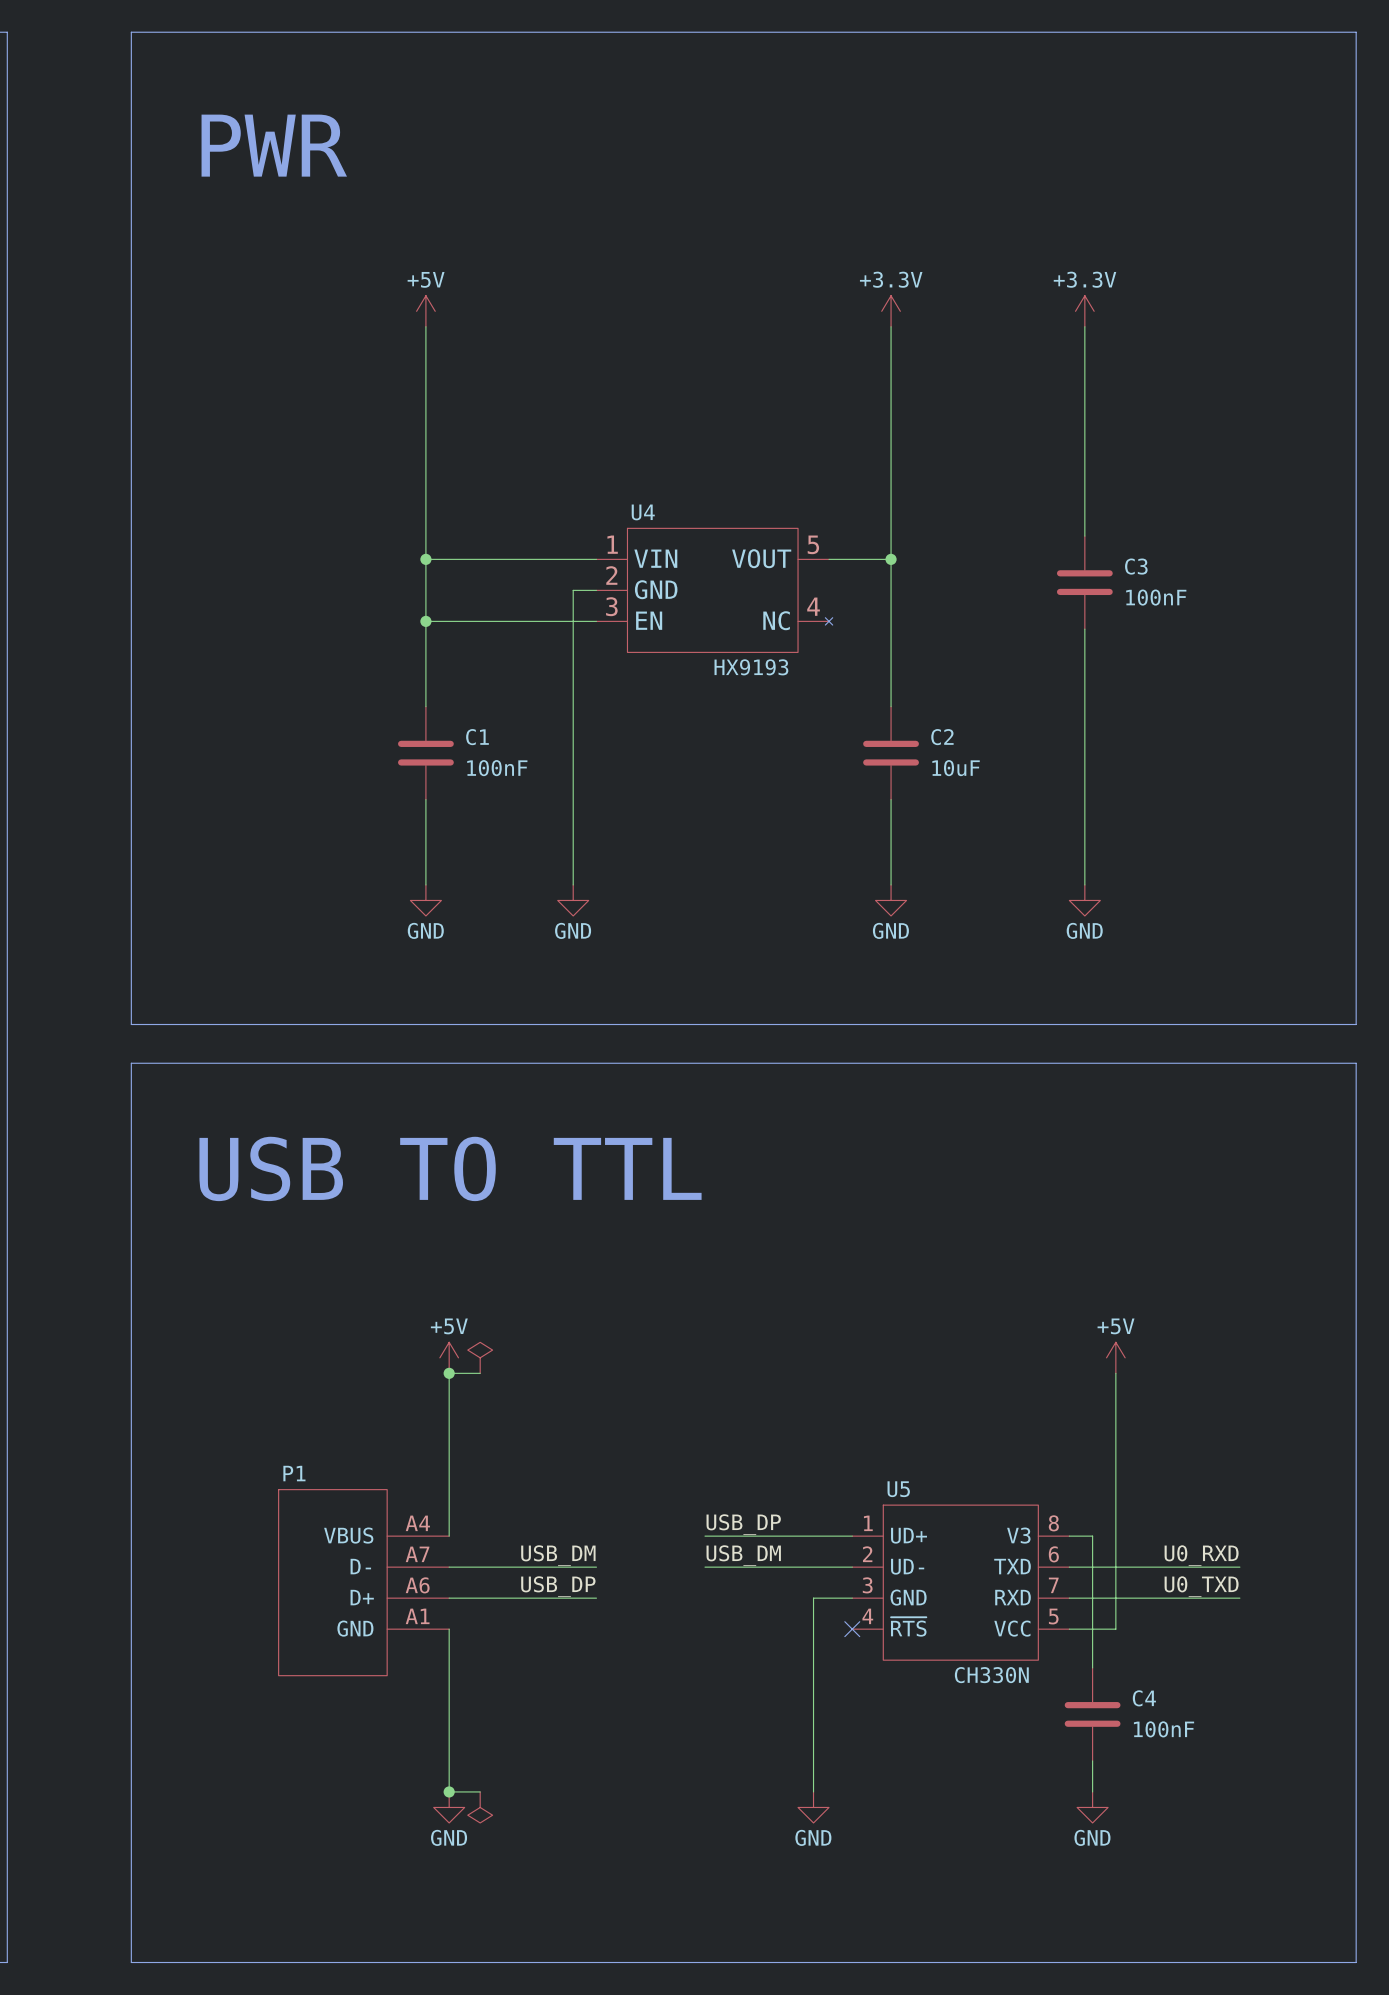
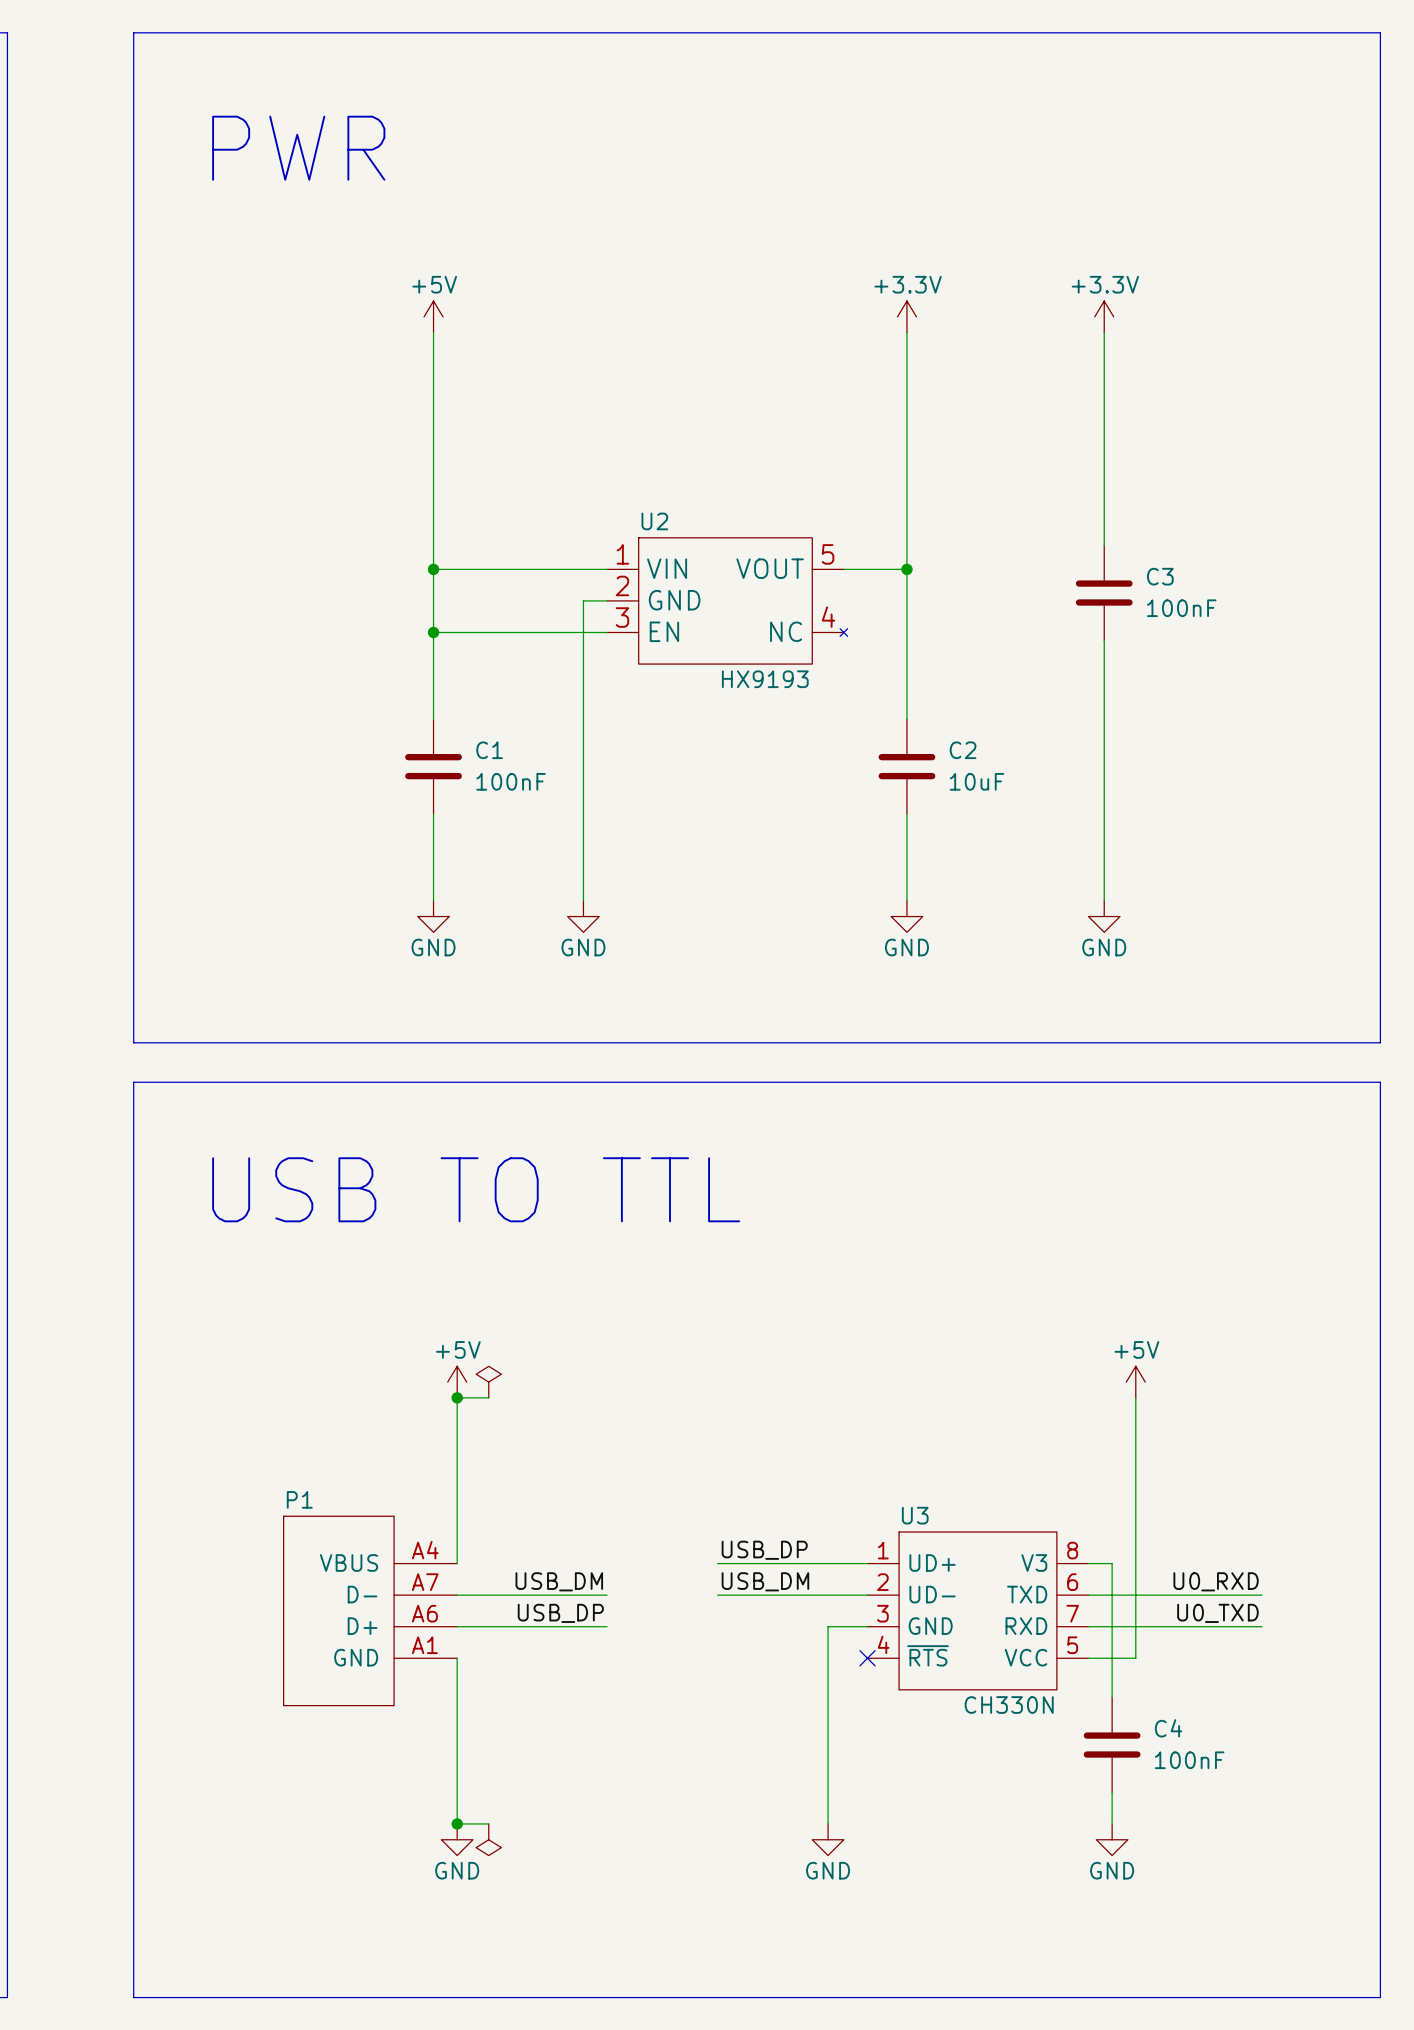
U4 name: U4 (643, 512) -> U2 (654, 521)
U5 name: U5 (898, 1489) -> U3 (915, 1515)

